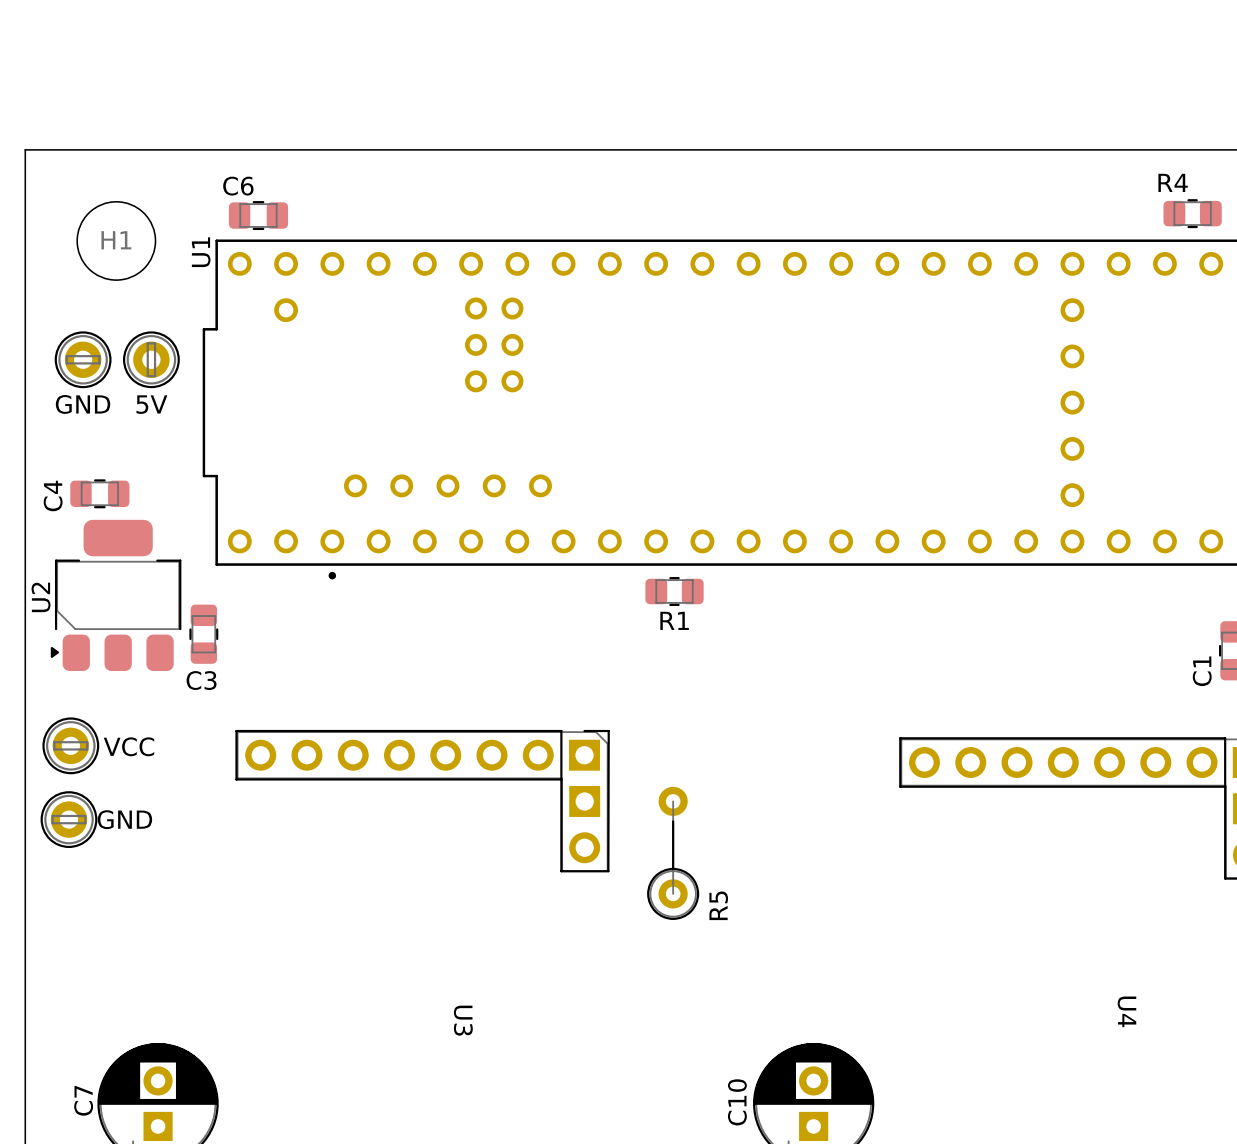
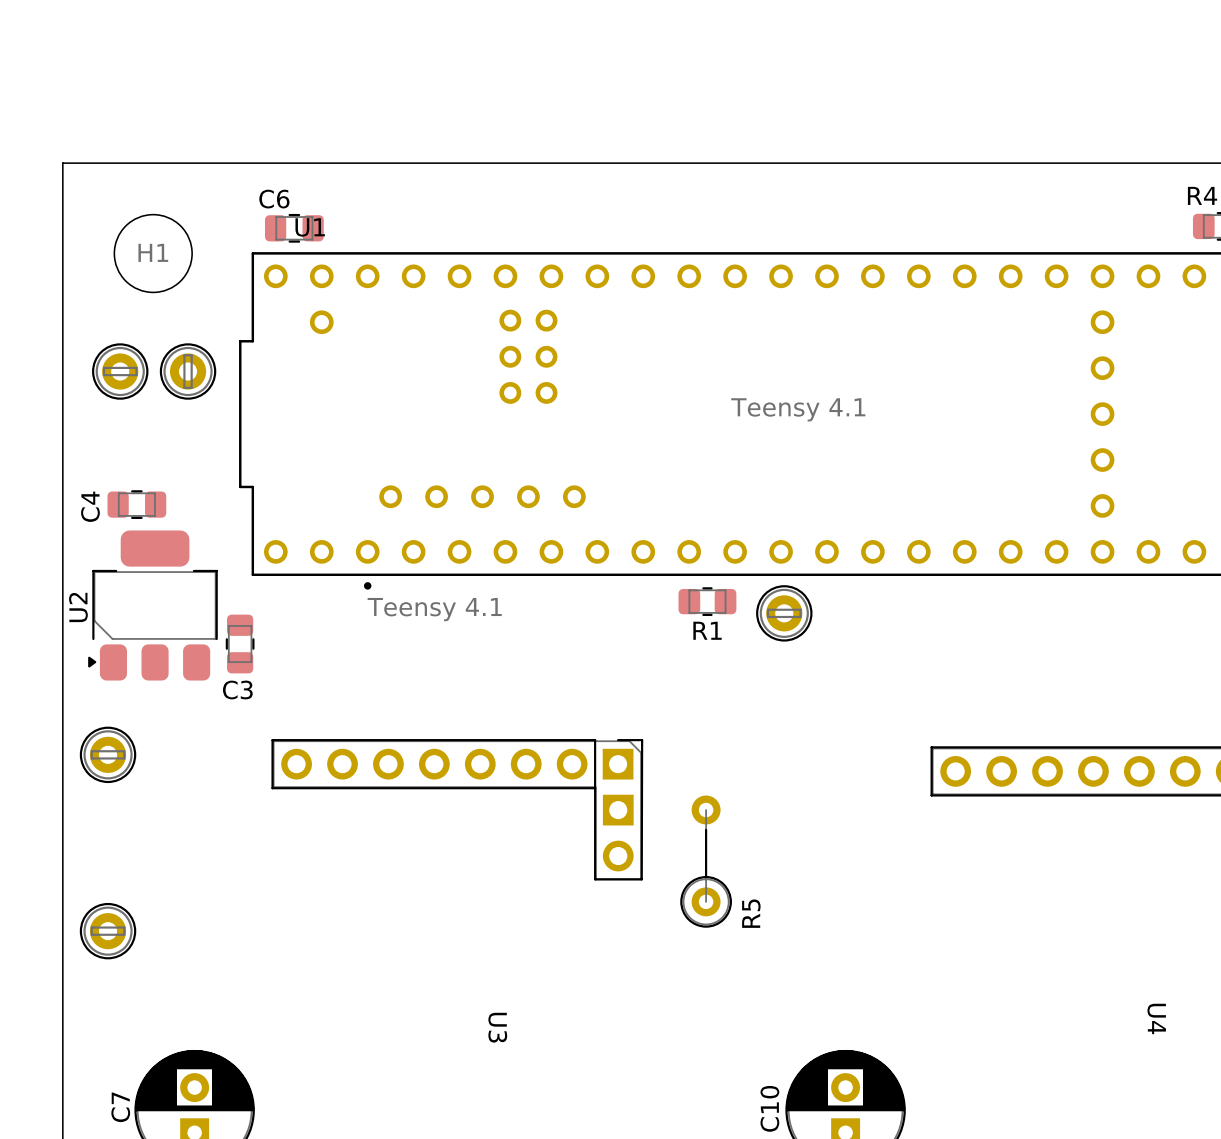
U1 name rotation: 0° (201, 252) -> 90° clockwise (310, 227)
U1 name position: U1 (201, 252) -> U1 (310, 227)
U1 text: none -> Teensy 4.1 (798, 409)
text: GND (83, 404) -> none
text: 5V (151, 404) -> none
U1 value: none -> Teensy 4.1 (434, 609)
part: none -> (784, 613)
text: VCC (129, 746) -> none
part position: (69, 819) -> (108, 931)
text: GND (124, 819) -> none

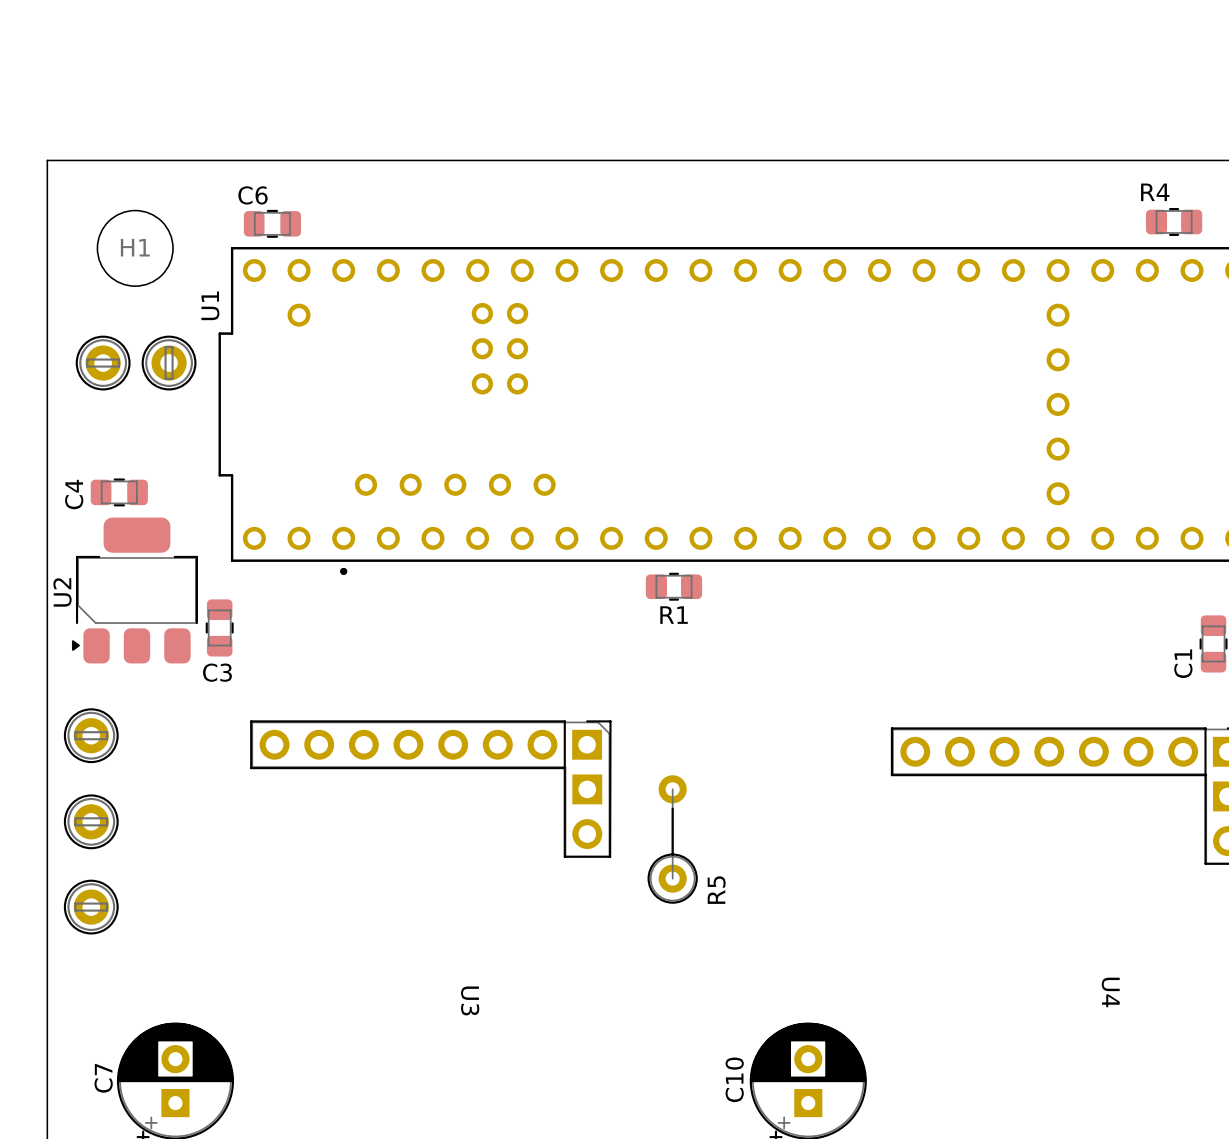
U1 name rotation: 0° (310, 227) -> 90° counterclockwise (210, 305)
U1 name position: U1 (310, 227) -> U1 (210, 305)
U1 text: Teensy 4.1 (798, 409) -> none
U1 value: Teensy 4.1 (434, 609) -> none
part: (784, 613) -> none
part: none -> (91, 821)

